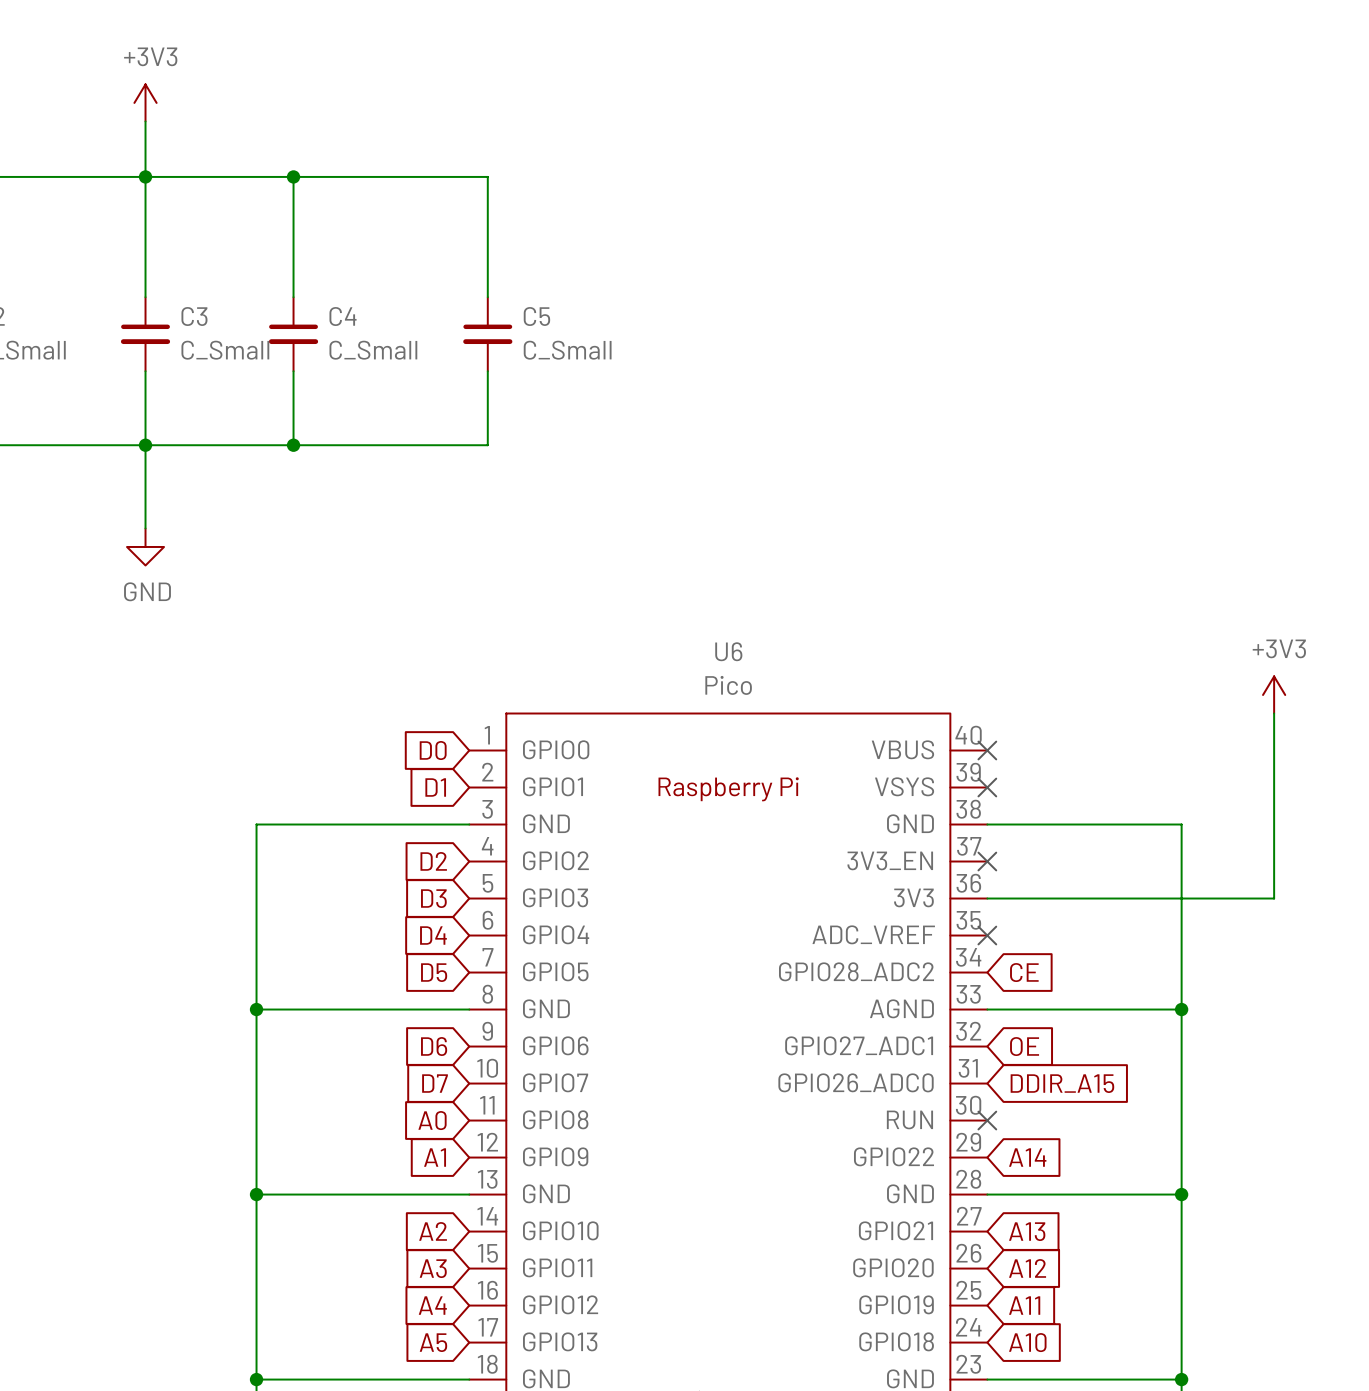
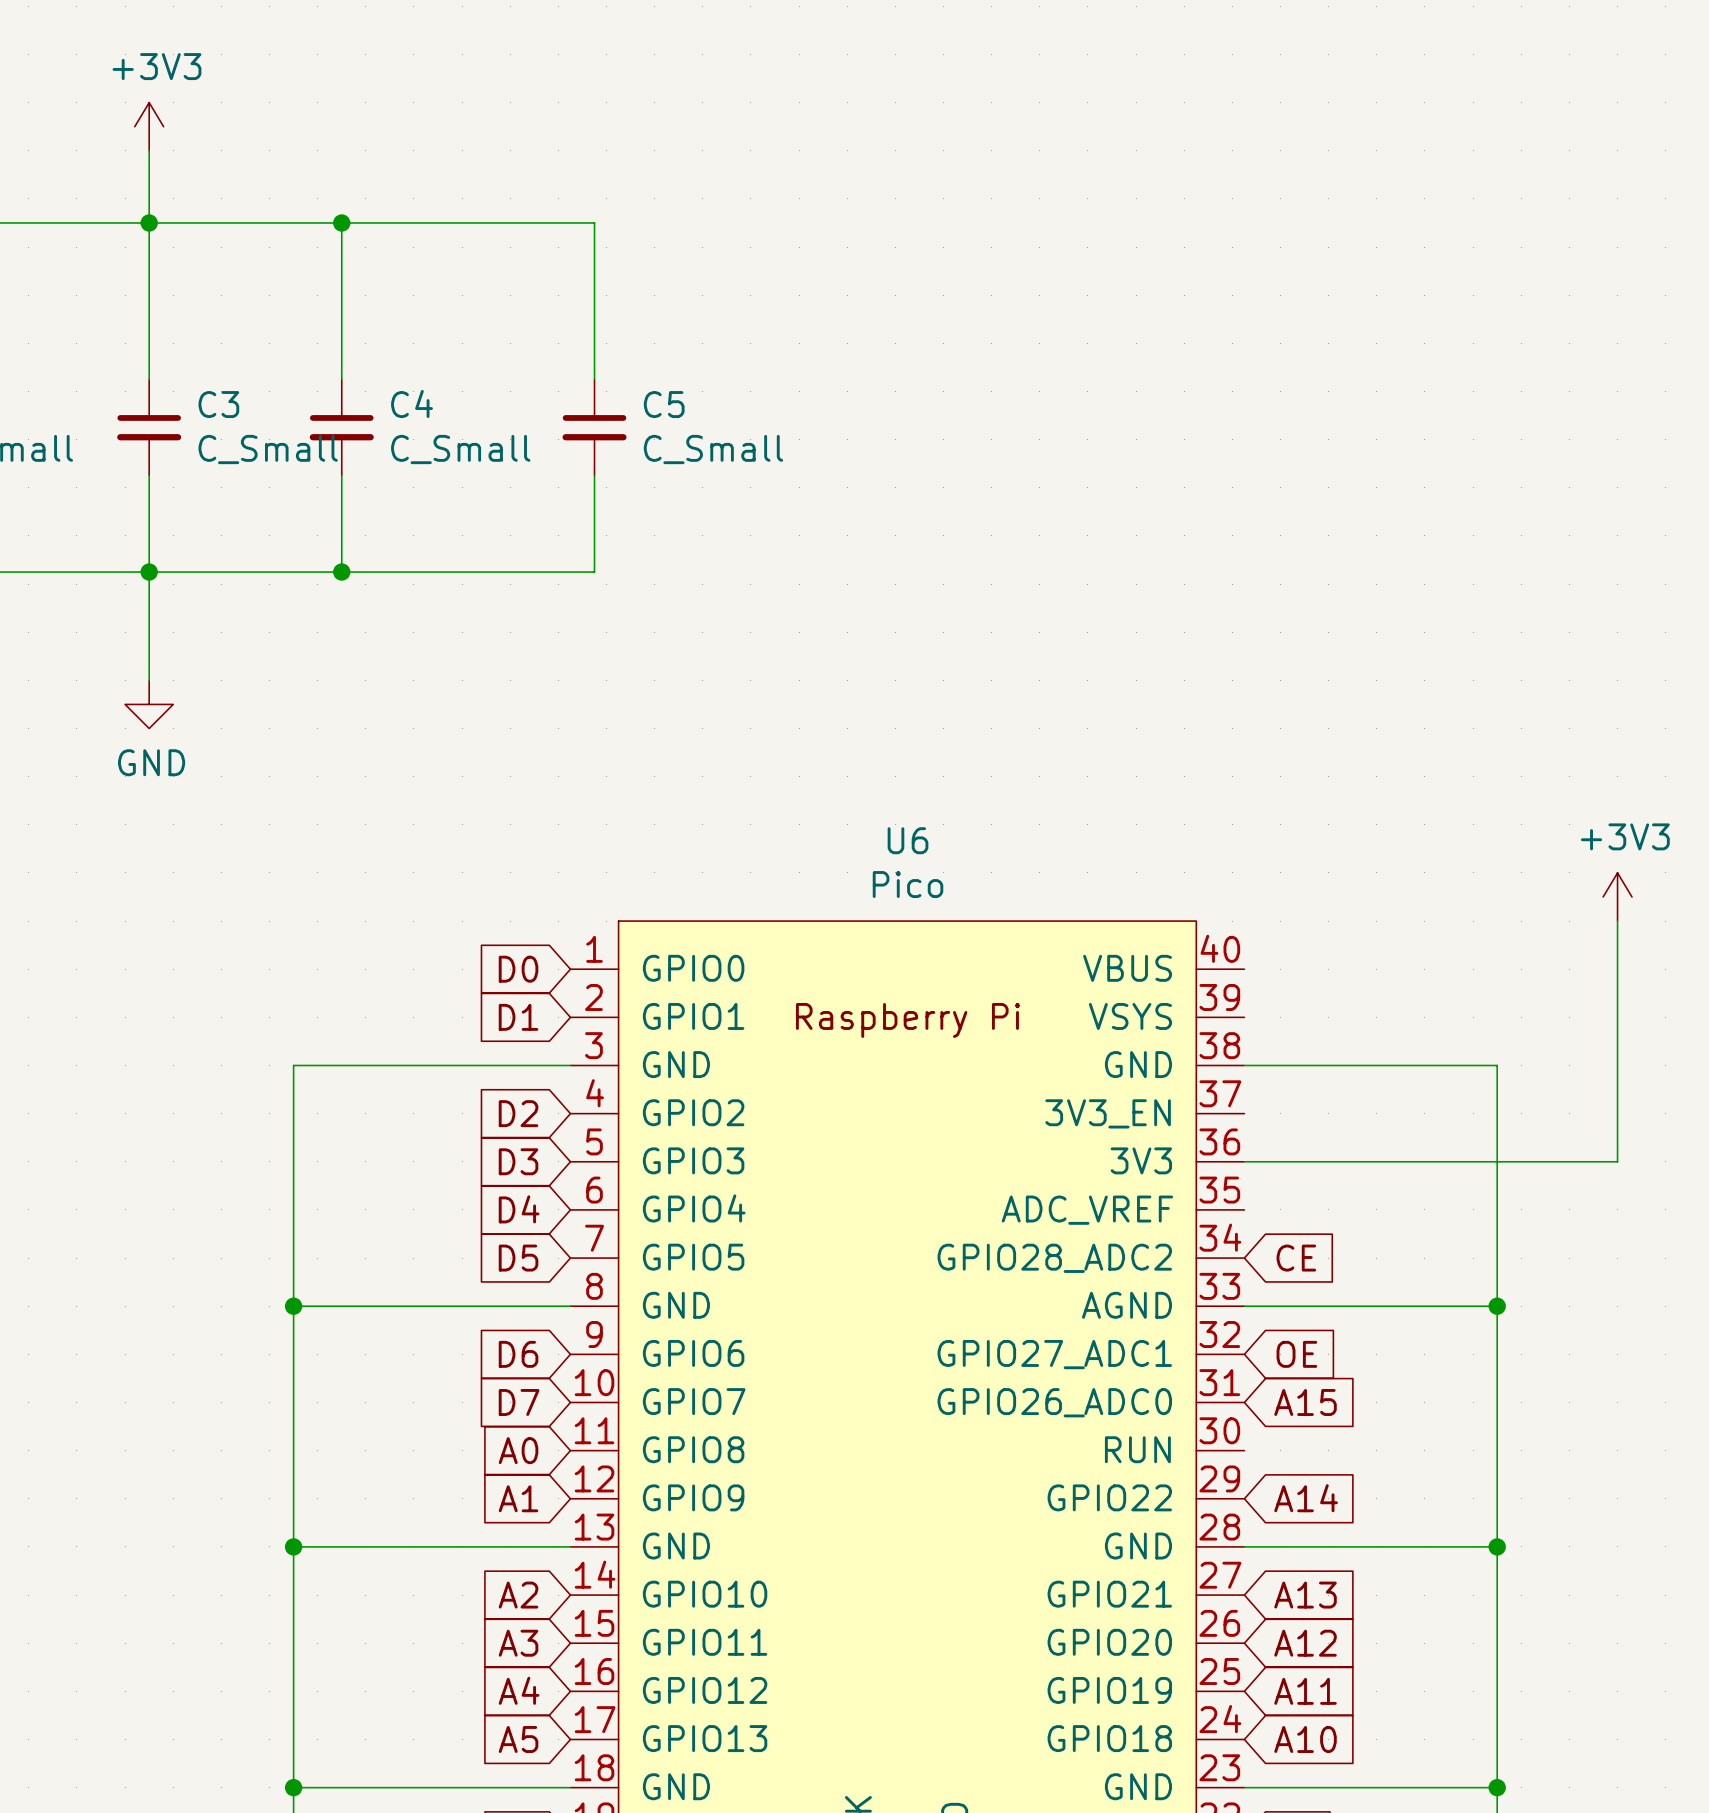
no-connect mark: (987, 750) -> none
no-connect mark: (987, 787) -> none
no-connect mark: (987, 861) -> none
no-connect mark: (987, 935) -> none
global label: DDIR_A15 (1062, 1083) -> A15 (1305, 1402)
no-connect mark: (987, 1120) -> none

